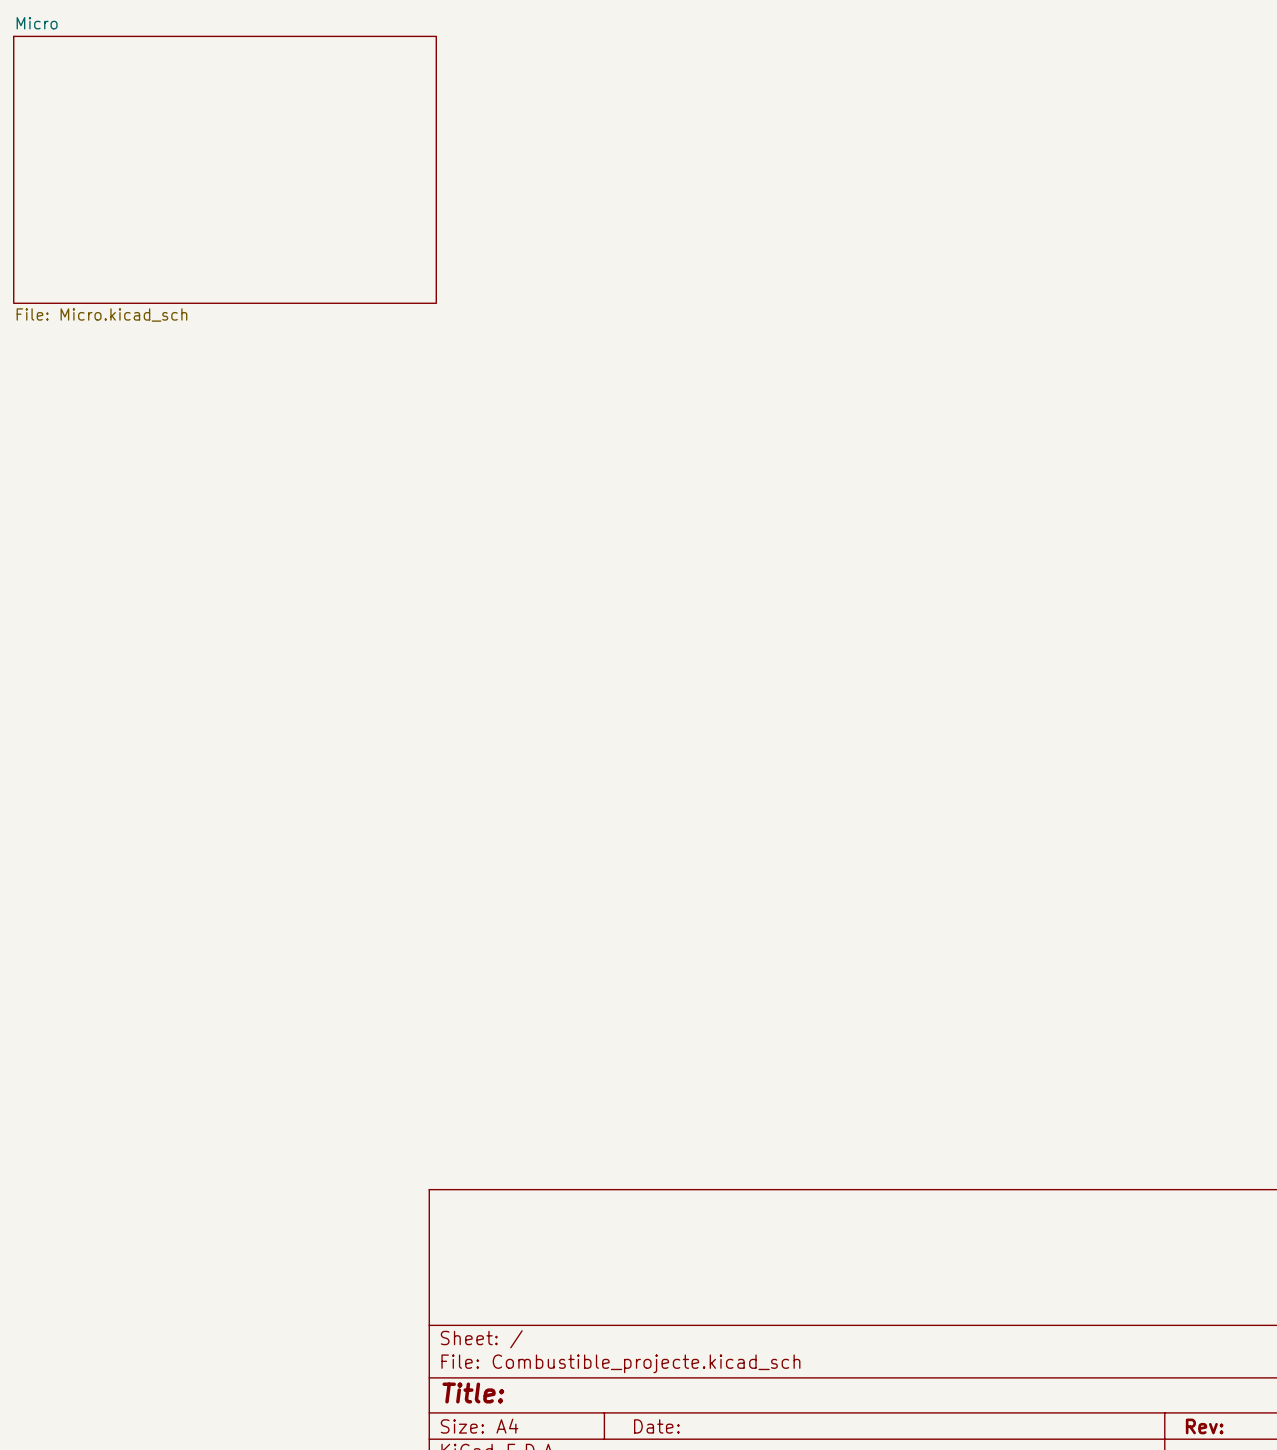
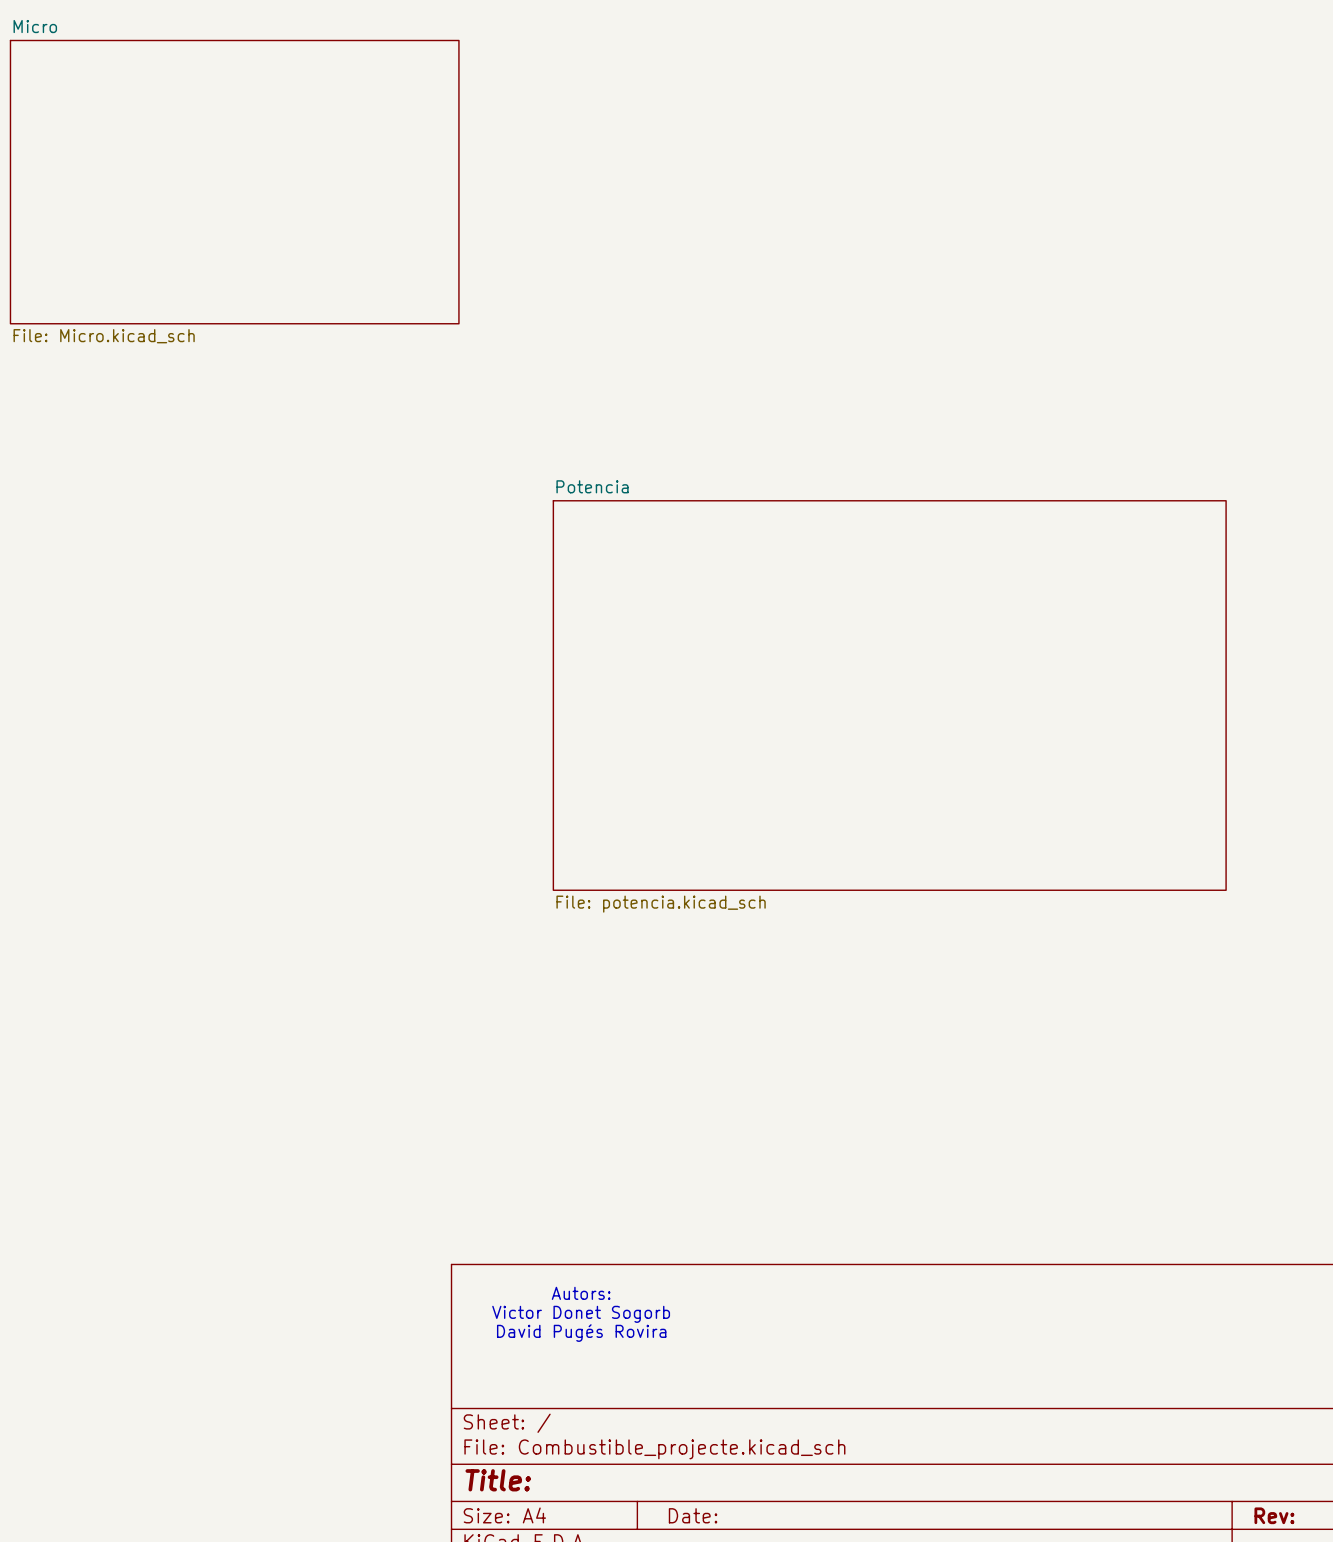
sheet Potencia: none -> File: potencia.kicad_sch (889, 695)
text: none -> Autors: (581, 1293)
text: none -> Victor Donet Sogorb (581, 1314)
text: none -> David Pugés Rovira (581, 1333)

